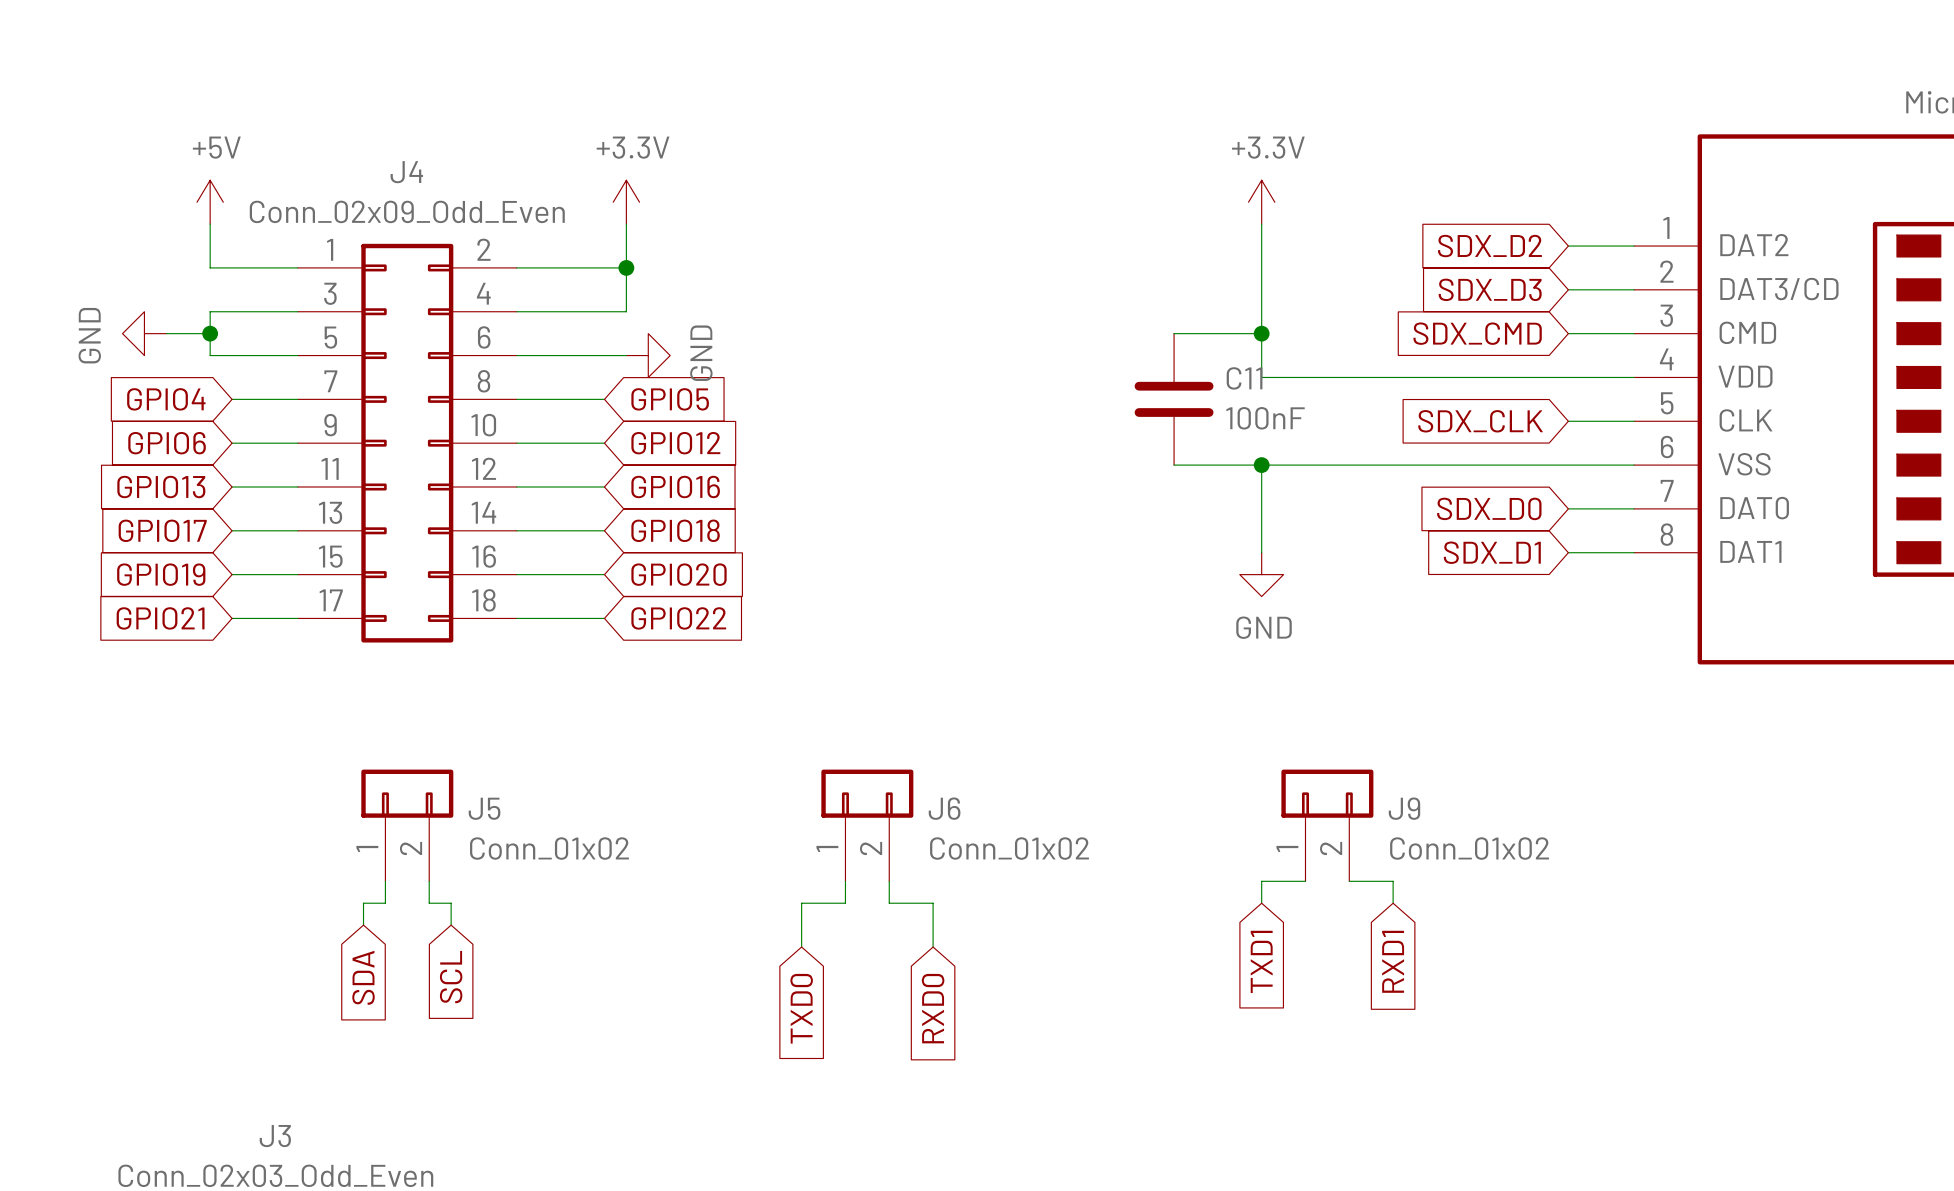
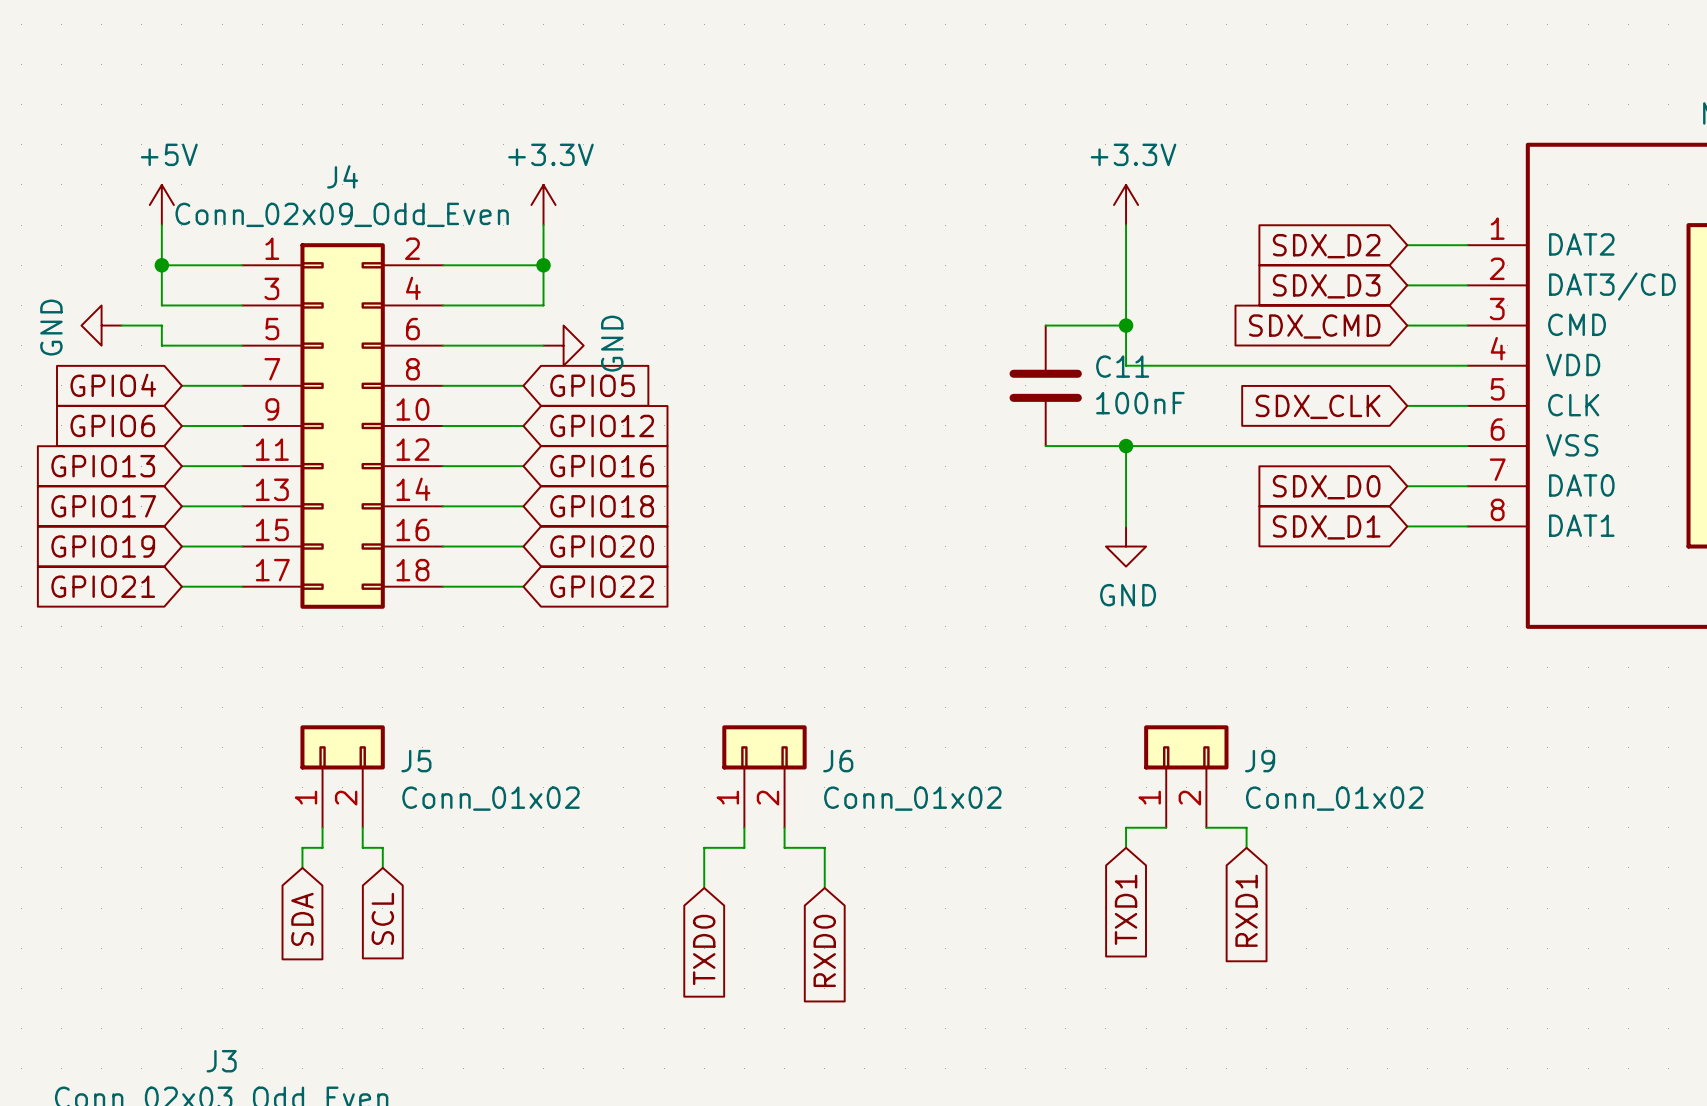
wire: (210, 311) (210, 333) -> (161, 305) (161, 265)
junction position: (210, 333) -> (161, 265)

